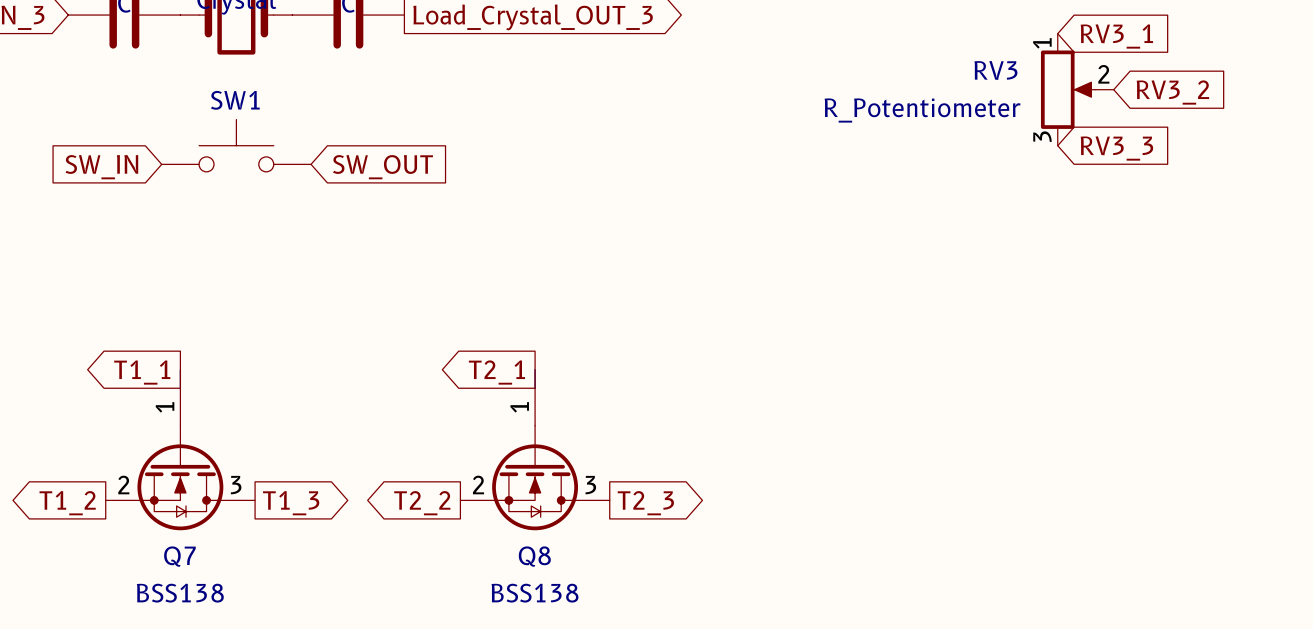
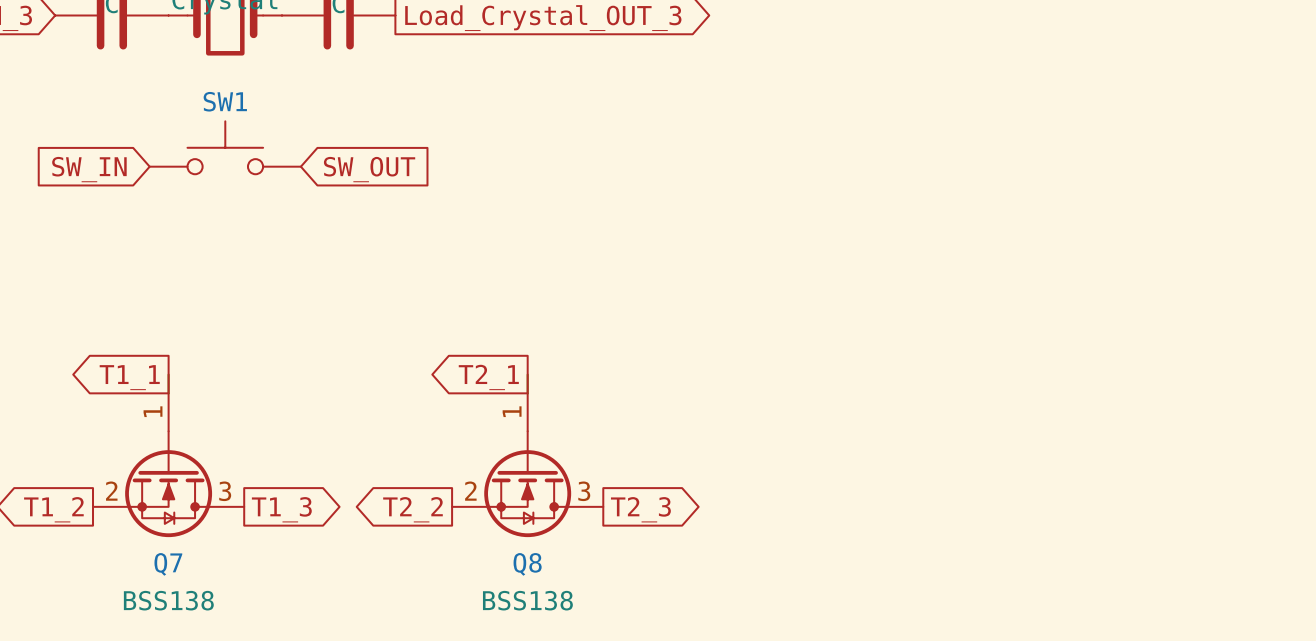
global label: RV3_1 (1116, 36) -> none
RV3: R_Potentiometer (1077, 89) -> none
global label: RV3_2 (1172, 92) -> none
global label: RV3_3 (1116, 148) -> none

